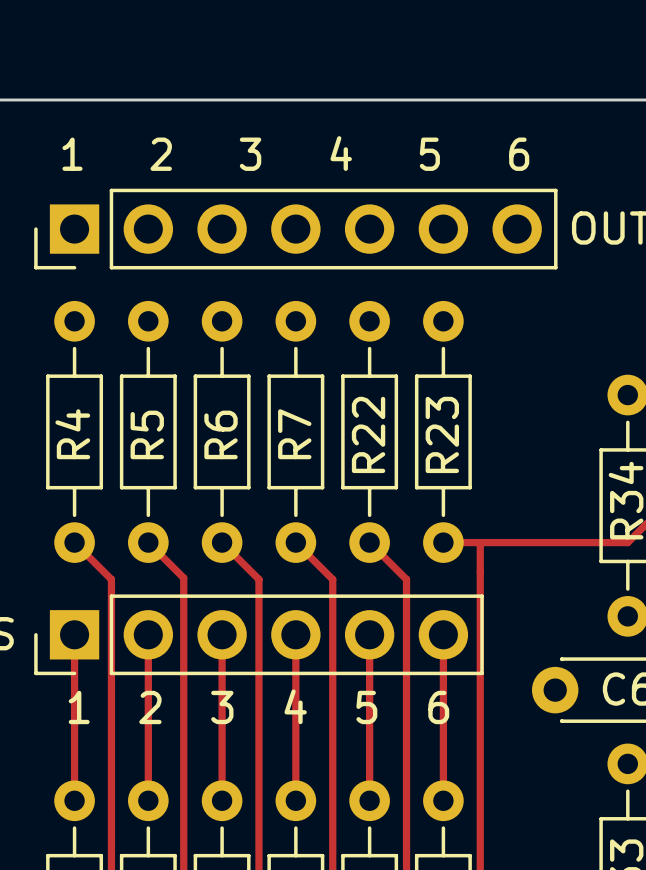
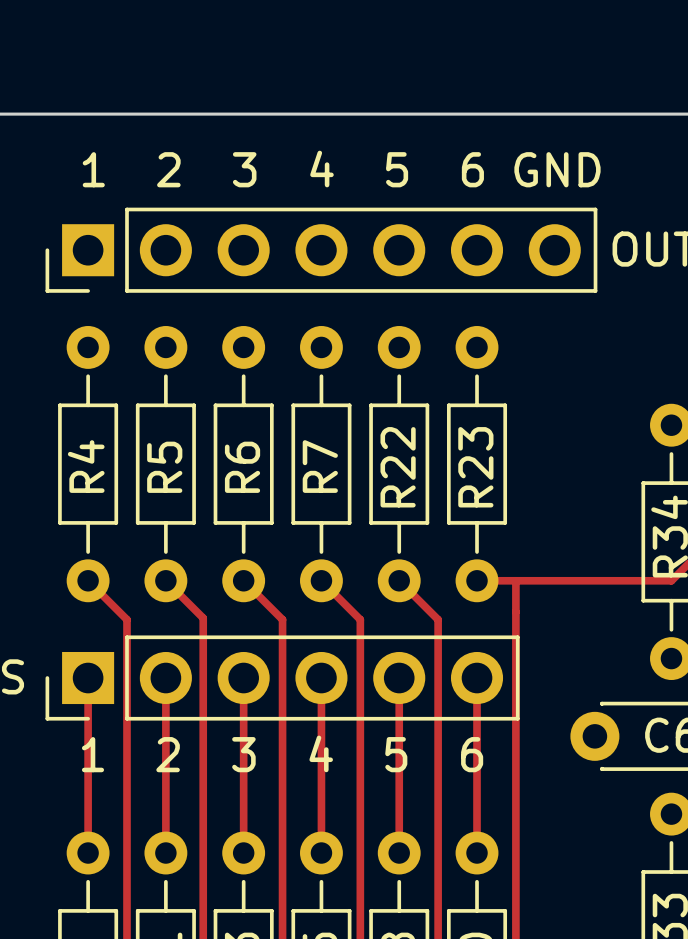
part text: none -> 1 2 3 4 5 6 GND (341, 169)
part text: 1 2 3 4 5 6 (295, 153) -> none

